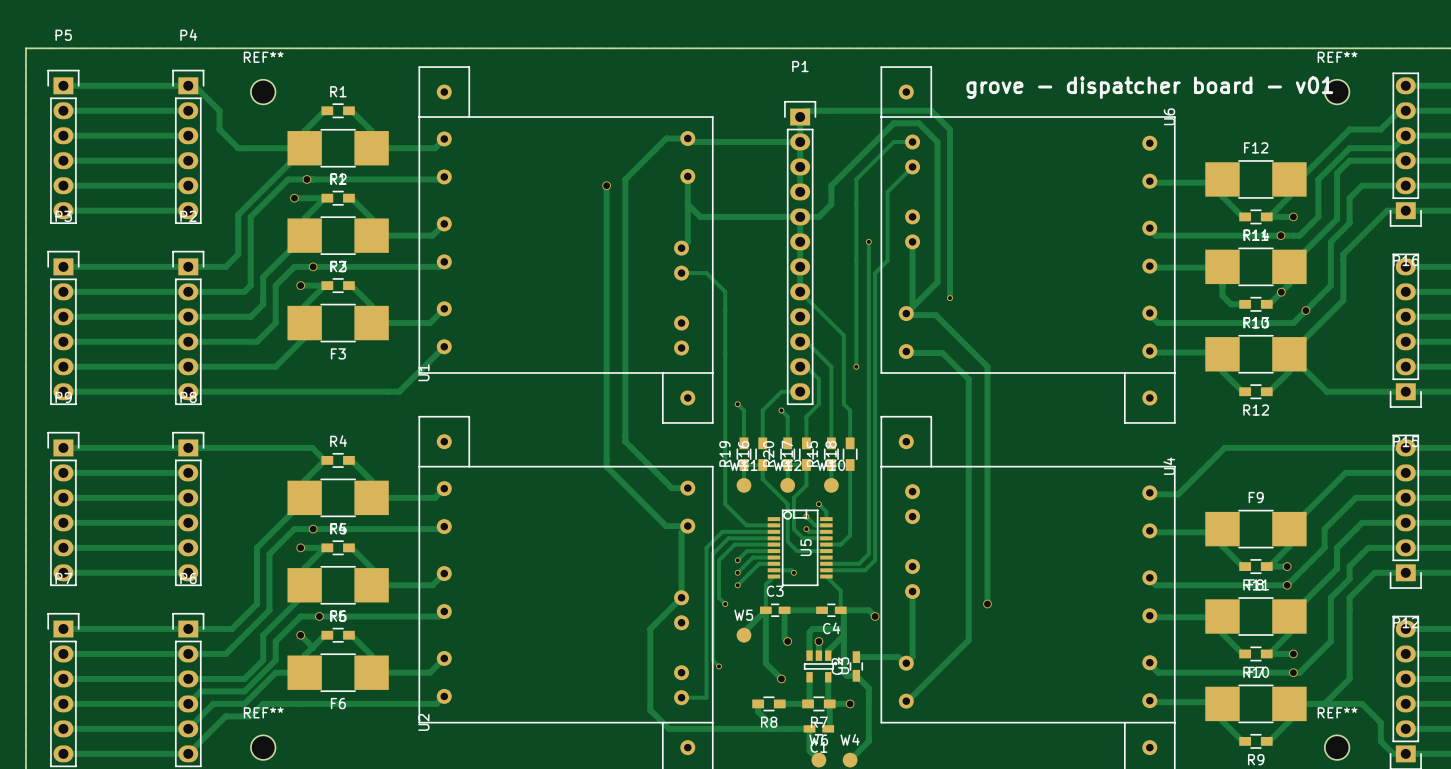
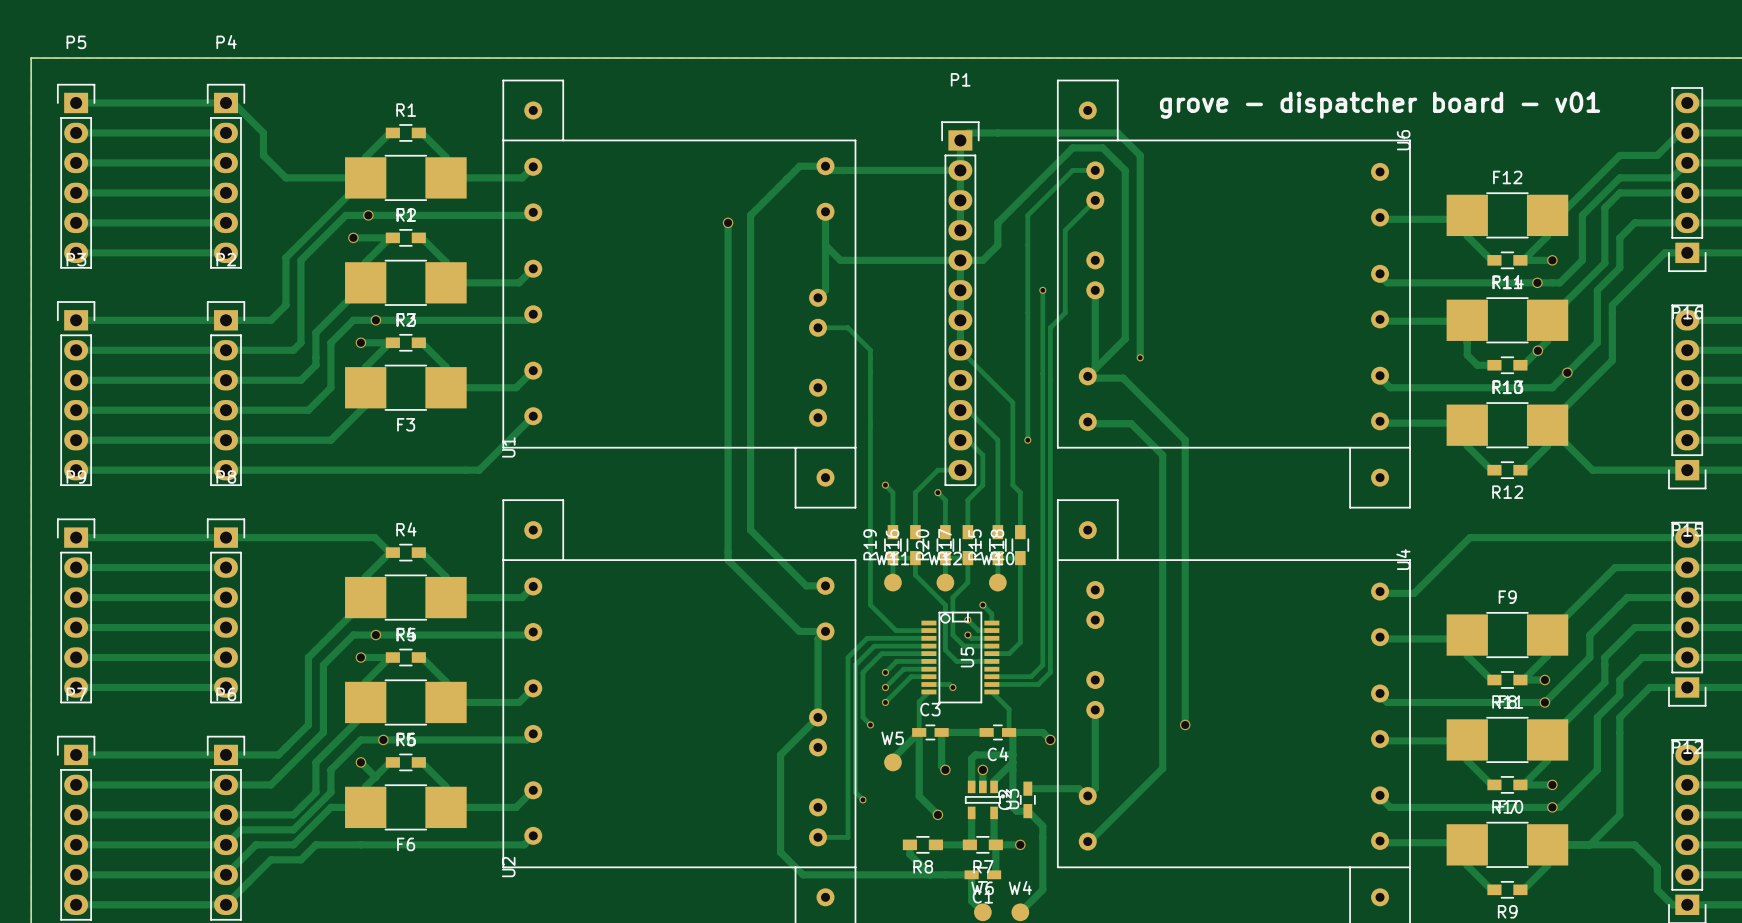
REF**: (263, 92) -> none
REF**: (1337, 92) -> none
REF**: (263, 747) -> none
REF**: (1337, 747) -> none

